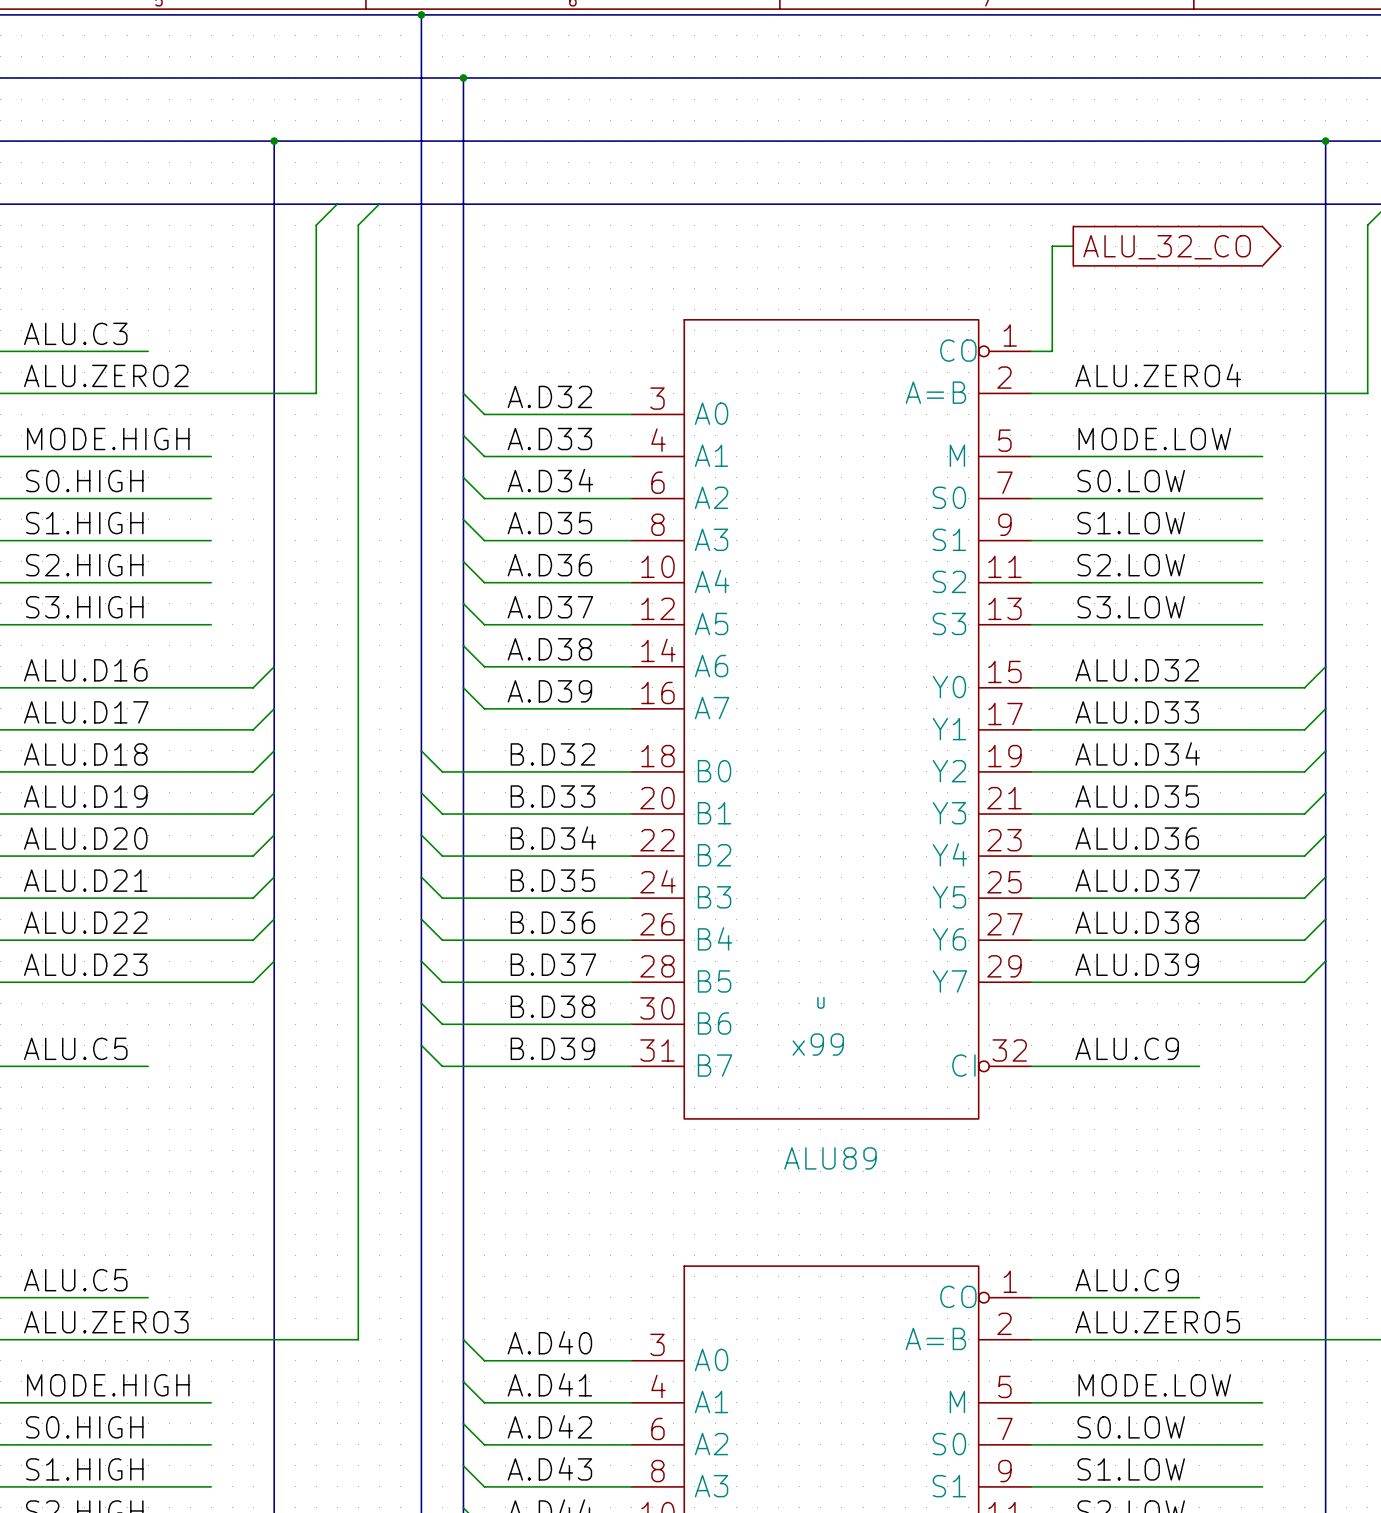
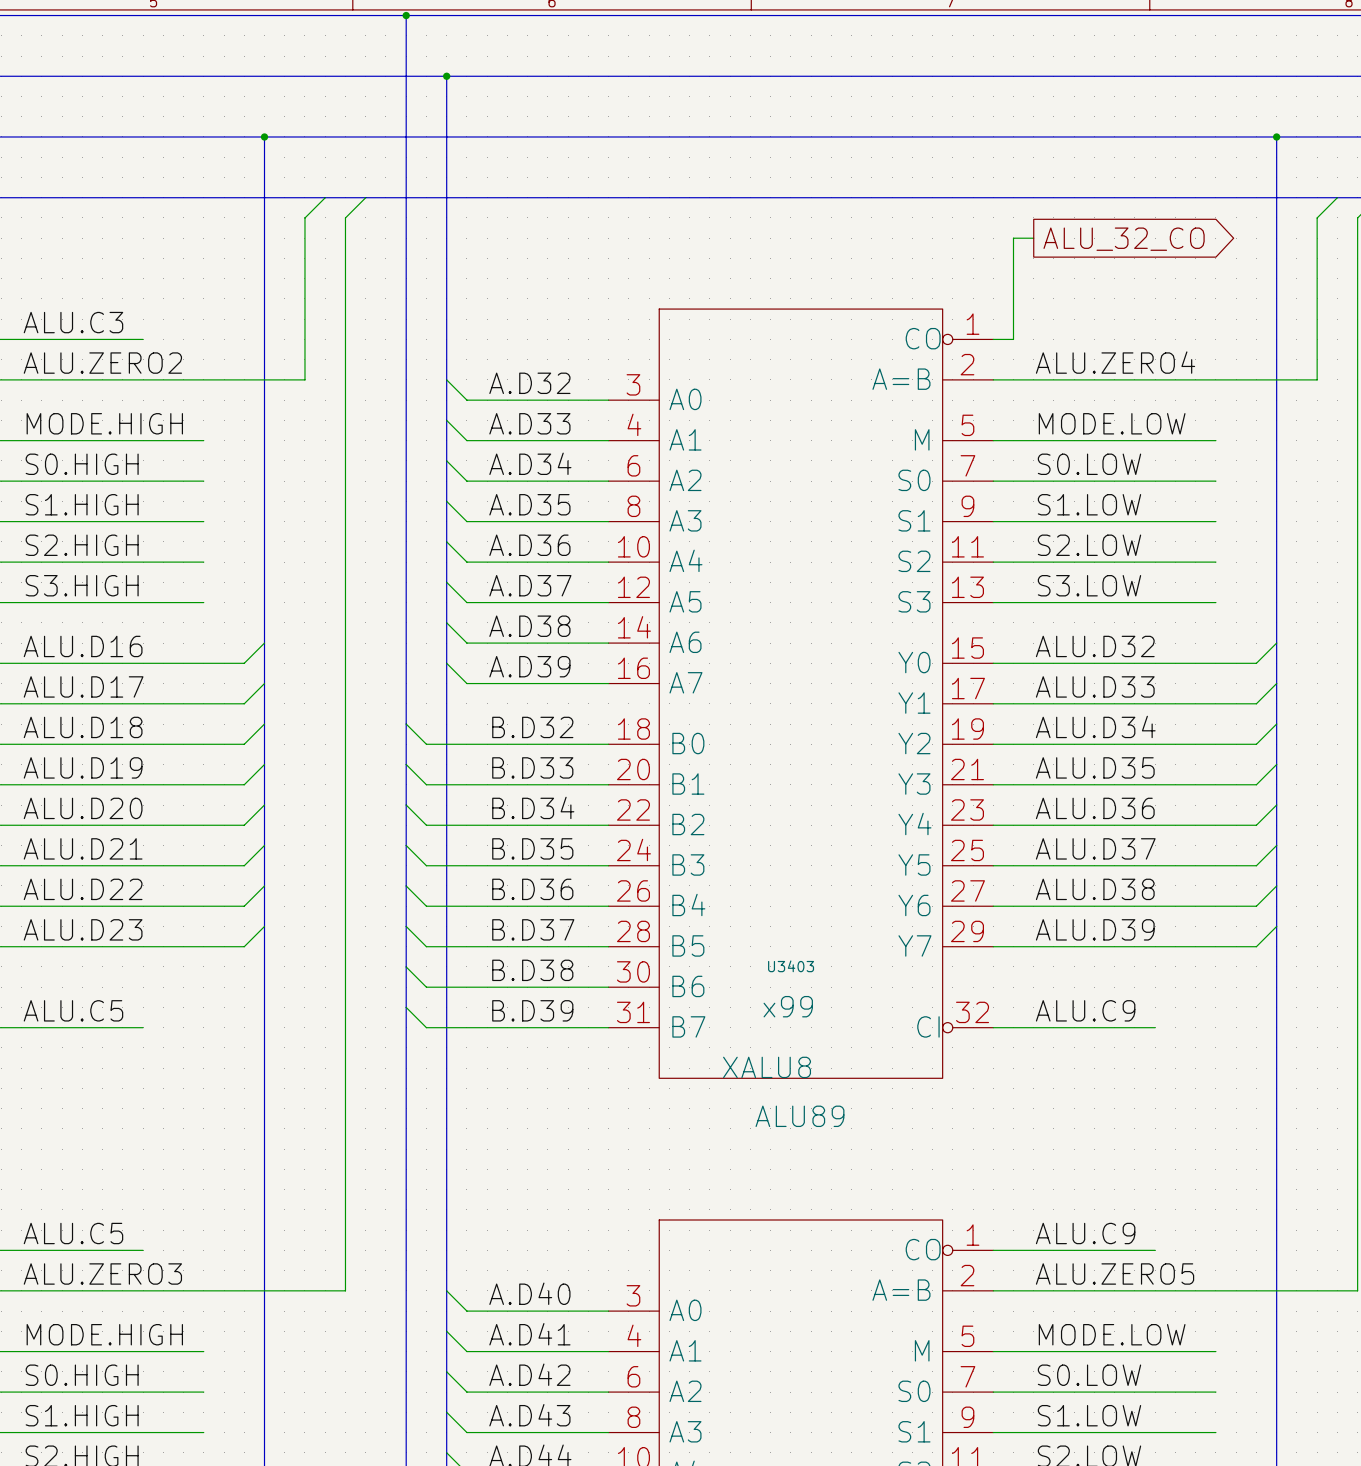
U name: U (820, 1002) -> U3403 (791, 966)
U value: none -> XALU8 (767, 1067)

